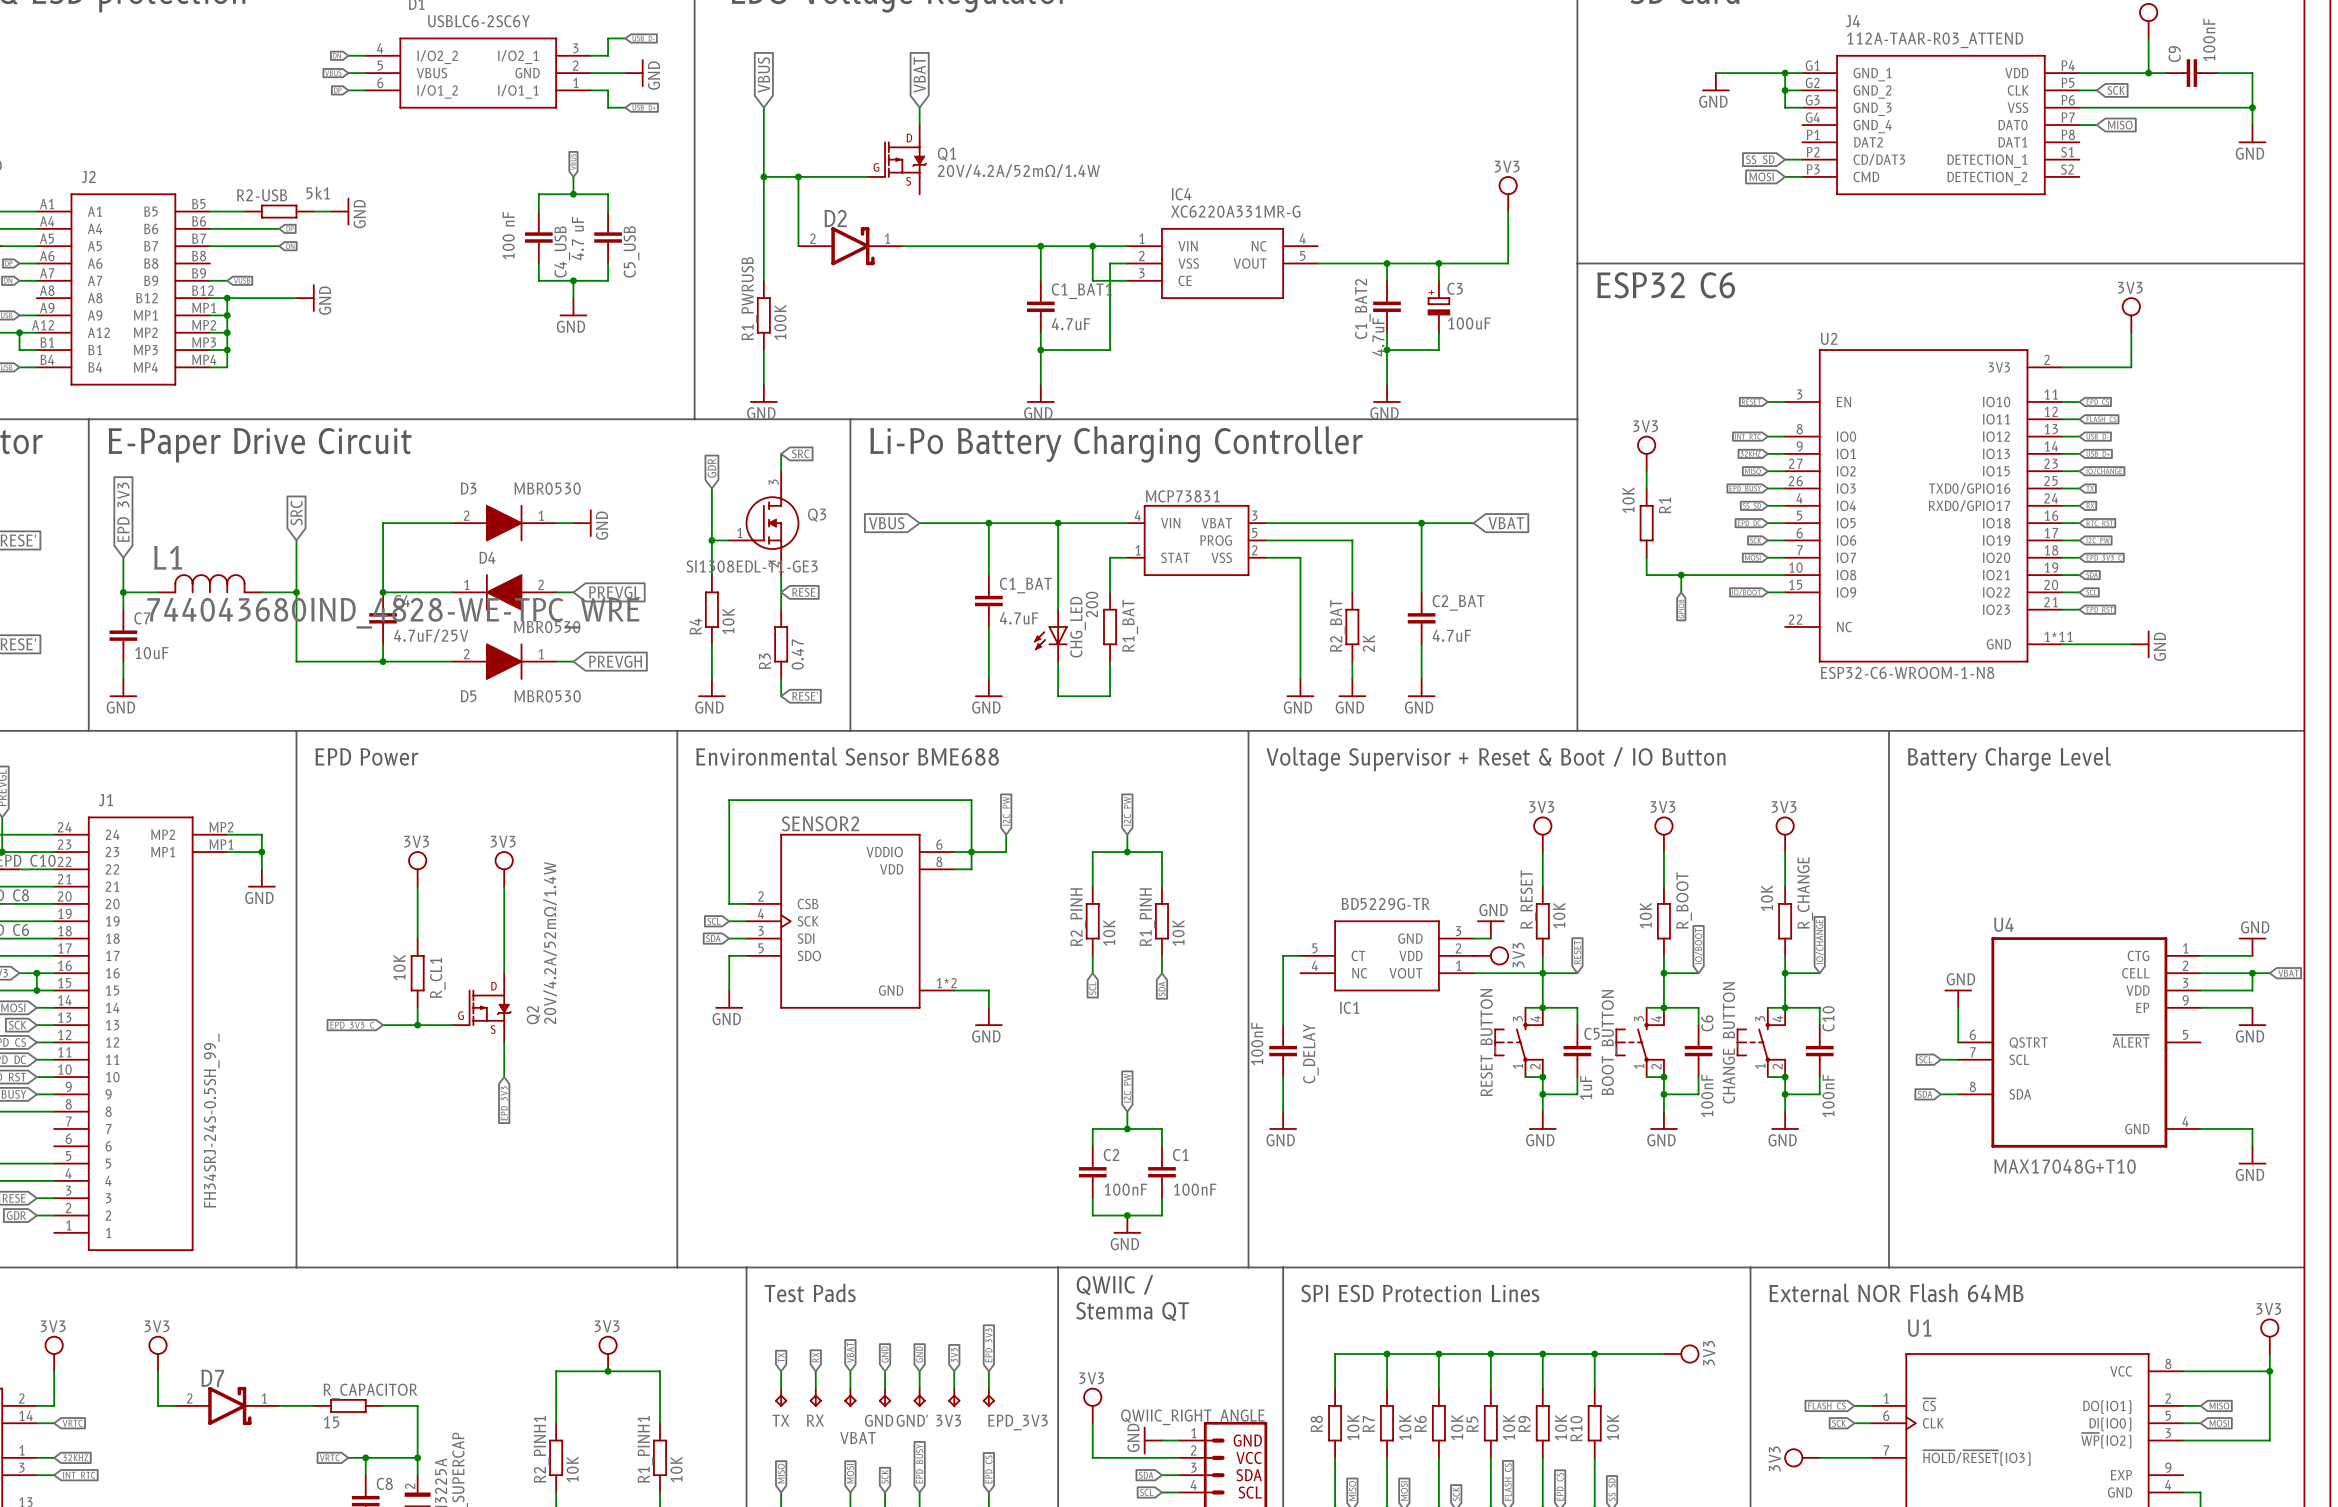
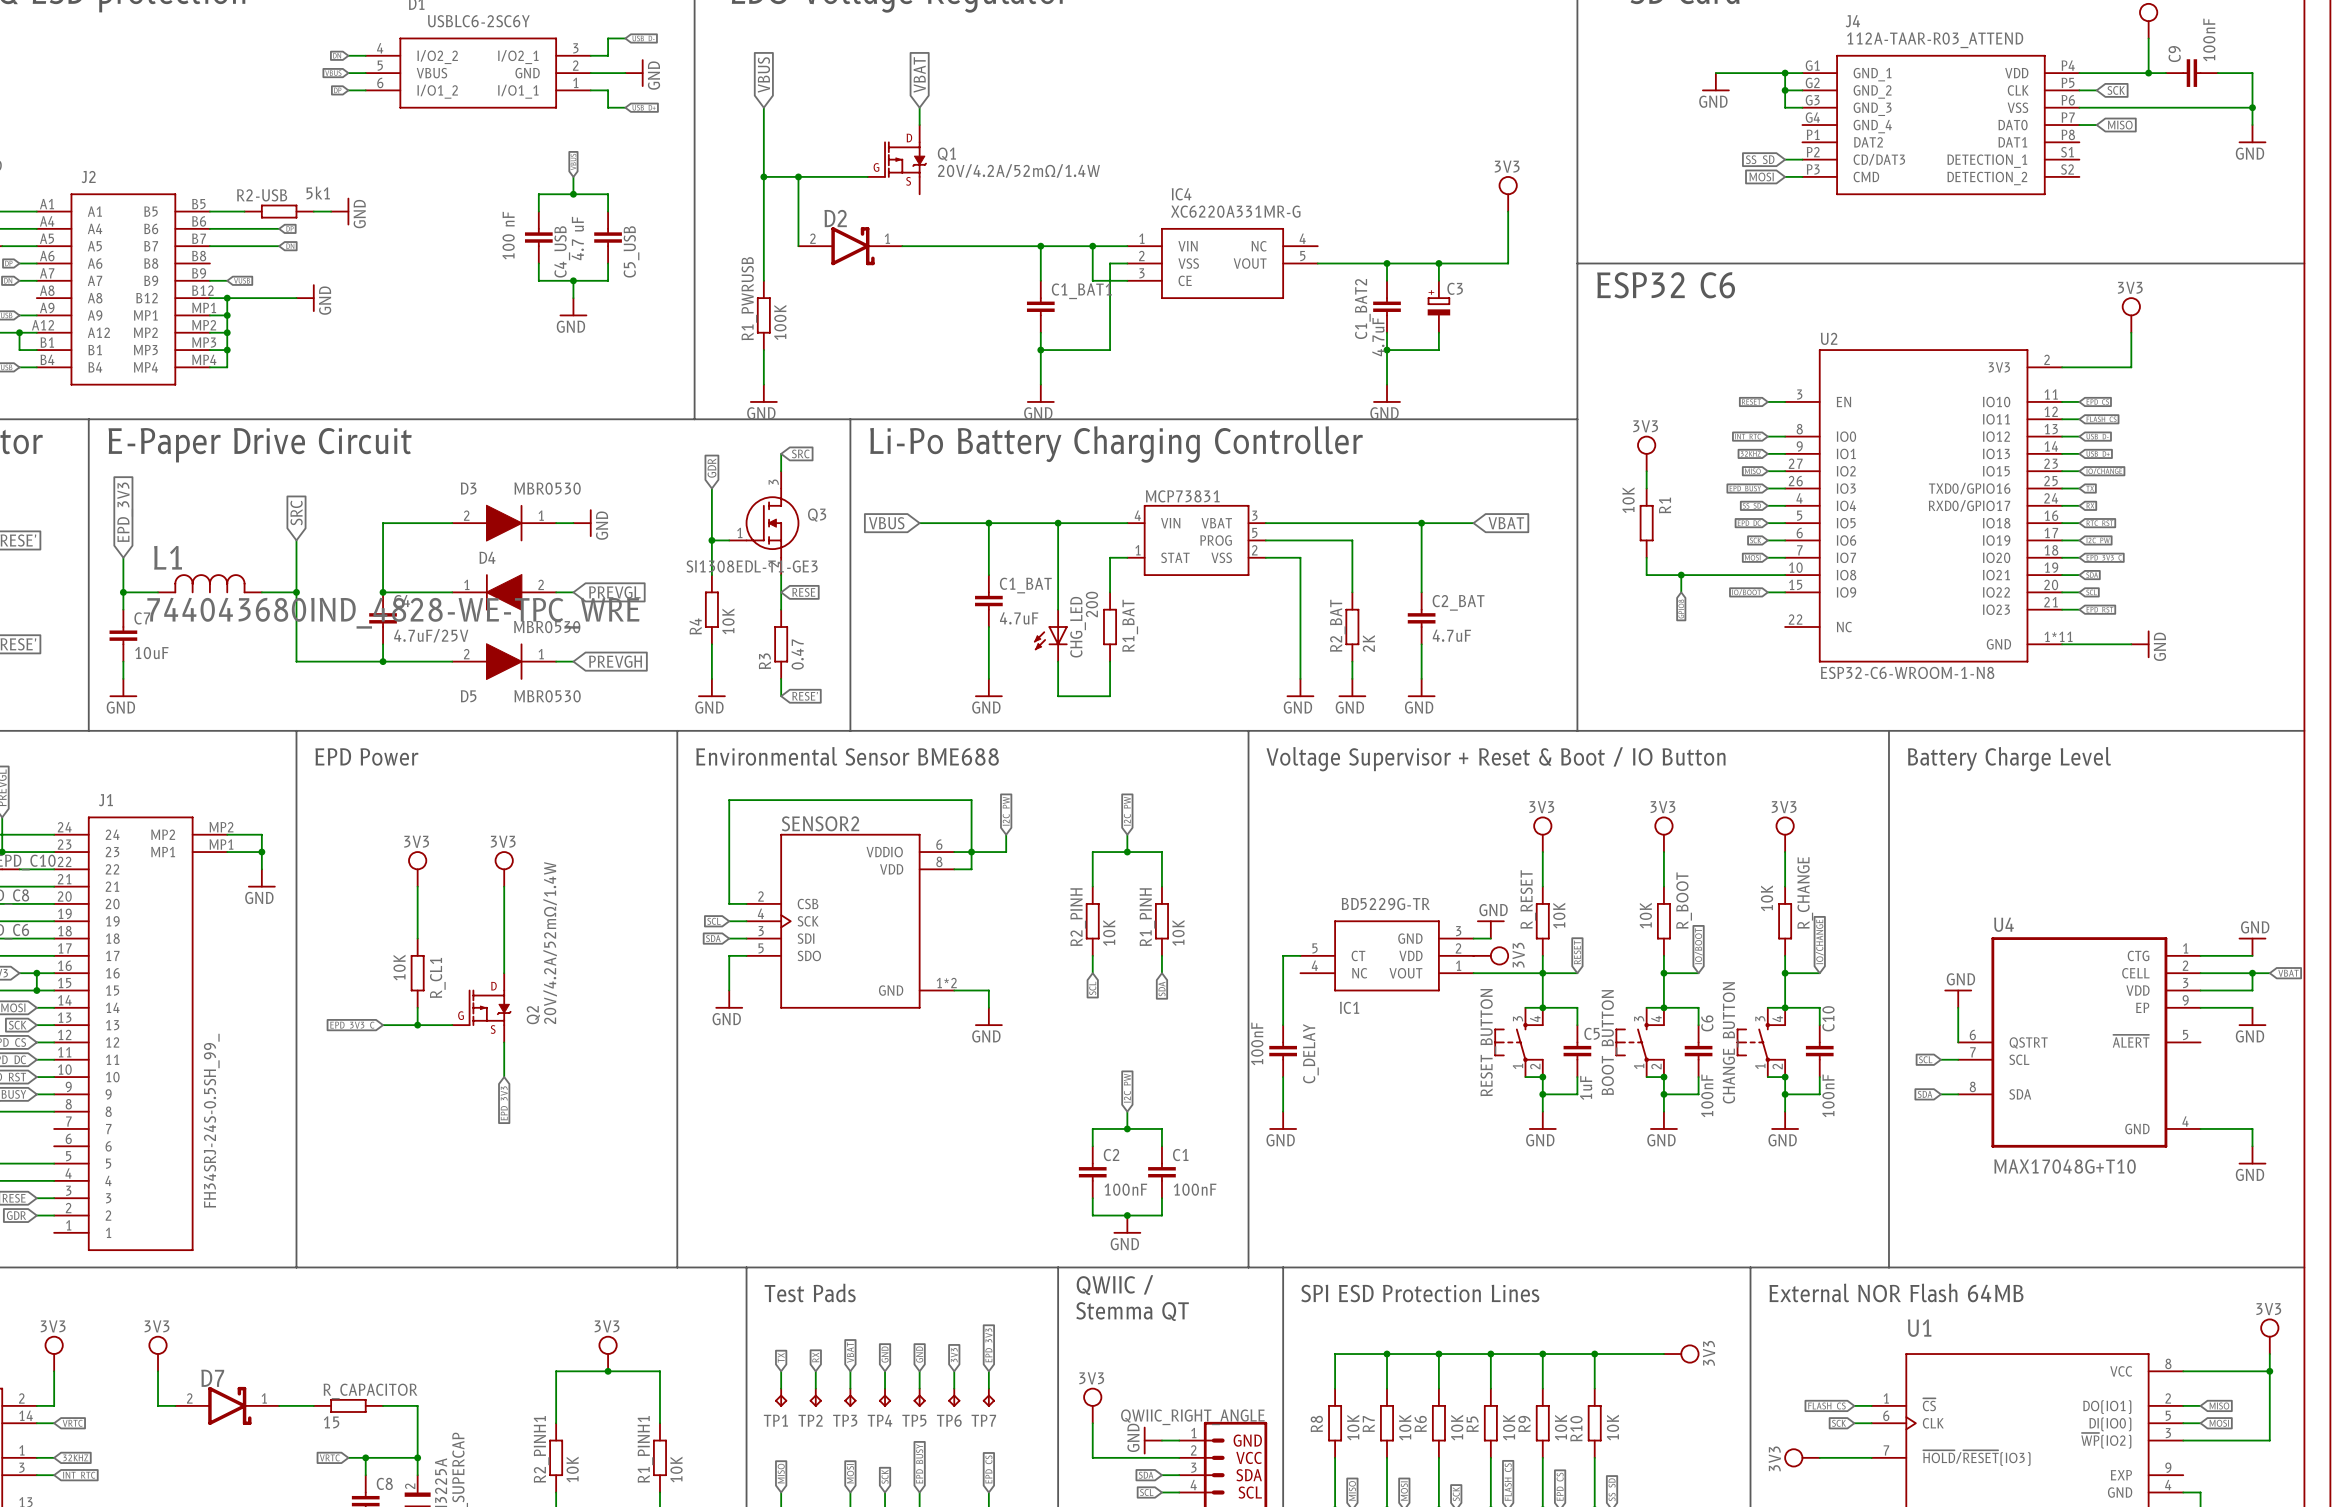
C3 value: 100uF (1469, 323) -> none
C1_BAT1 value: 4.7uF (1071, 324) -> none
TX name: TX (780, 1420) -> TP1 (775, 1420)
RX name: RX (815, 1420) -> TP2 (810, 1420)
GND name: GND (879, 1420) -> TP4 (879, 1420)
GND' name: GND' (912, 1420) -> TP5 (914, 1420)
3V3 name: 3V3 (948, 1420) -> TP6 (949, 1420)
EPD_3V3 name: EPD_3V3 (1017, 1422) -> TP7 (983, 1420)
VBAT name: VBAT (858, 1438) -> TP3 (845, 1420)

